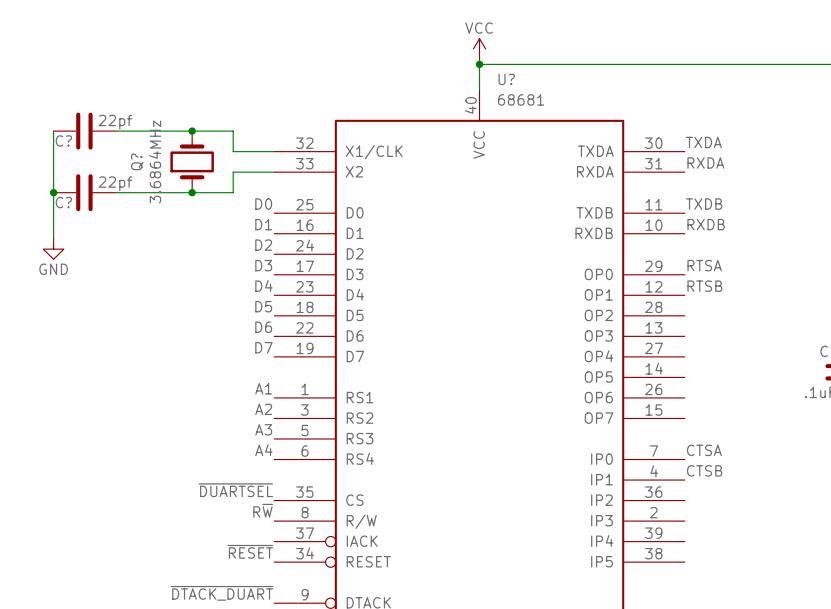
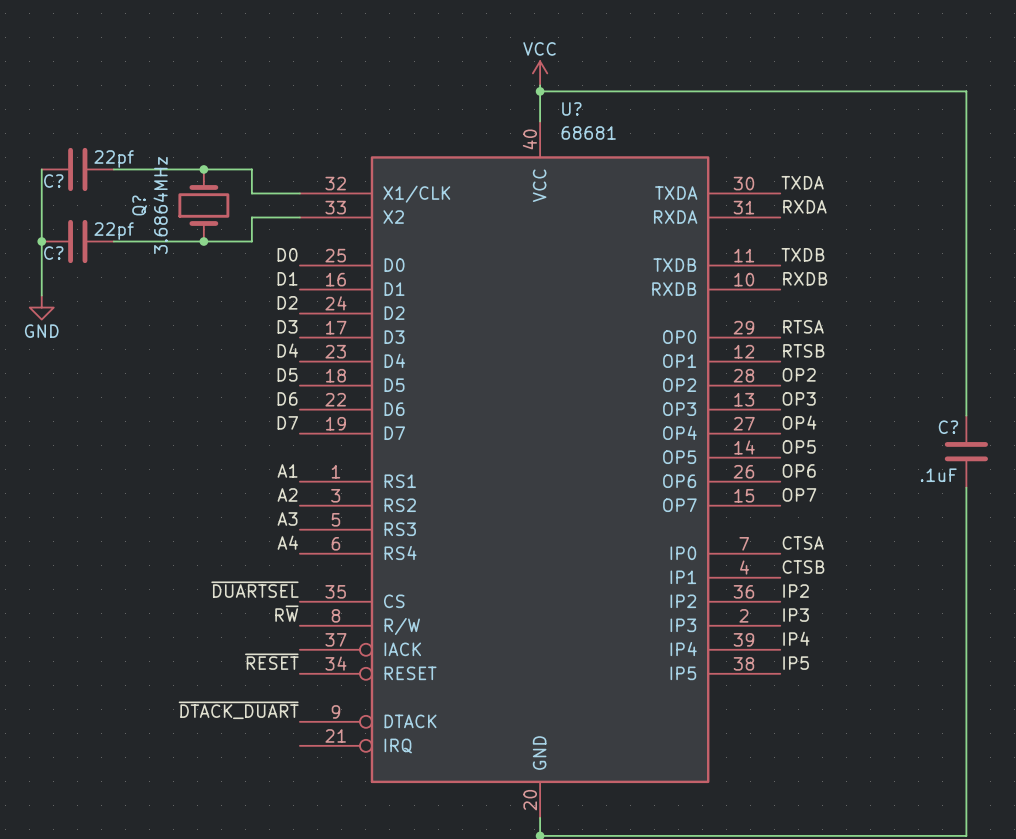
label: none -> OP2 (799, 374)
label: none -> OP3 (799, 398)
label: none -> OP4 (799, 422)
label: none -> OP5 (799, 446)
label: none -> OP6 (799, 470)
label: none -> OP7 (799, 494)
label: none -> IP2 (796, 591)
label: none -> IP3 (796, 615)
label: none -> IP4 (796, 638)
label: none -> IP5 (796, 663)

